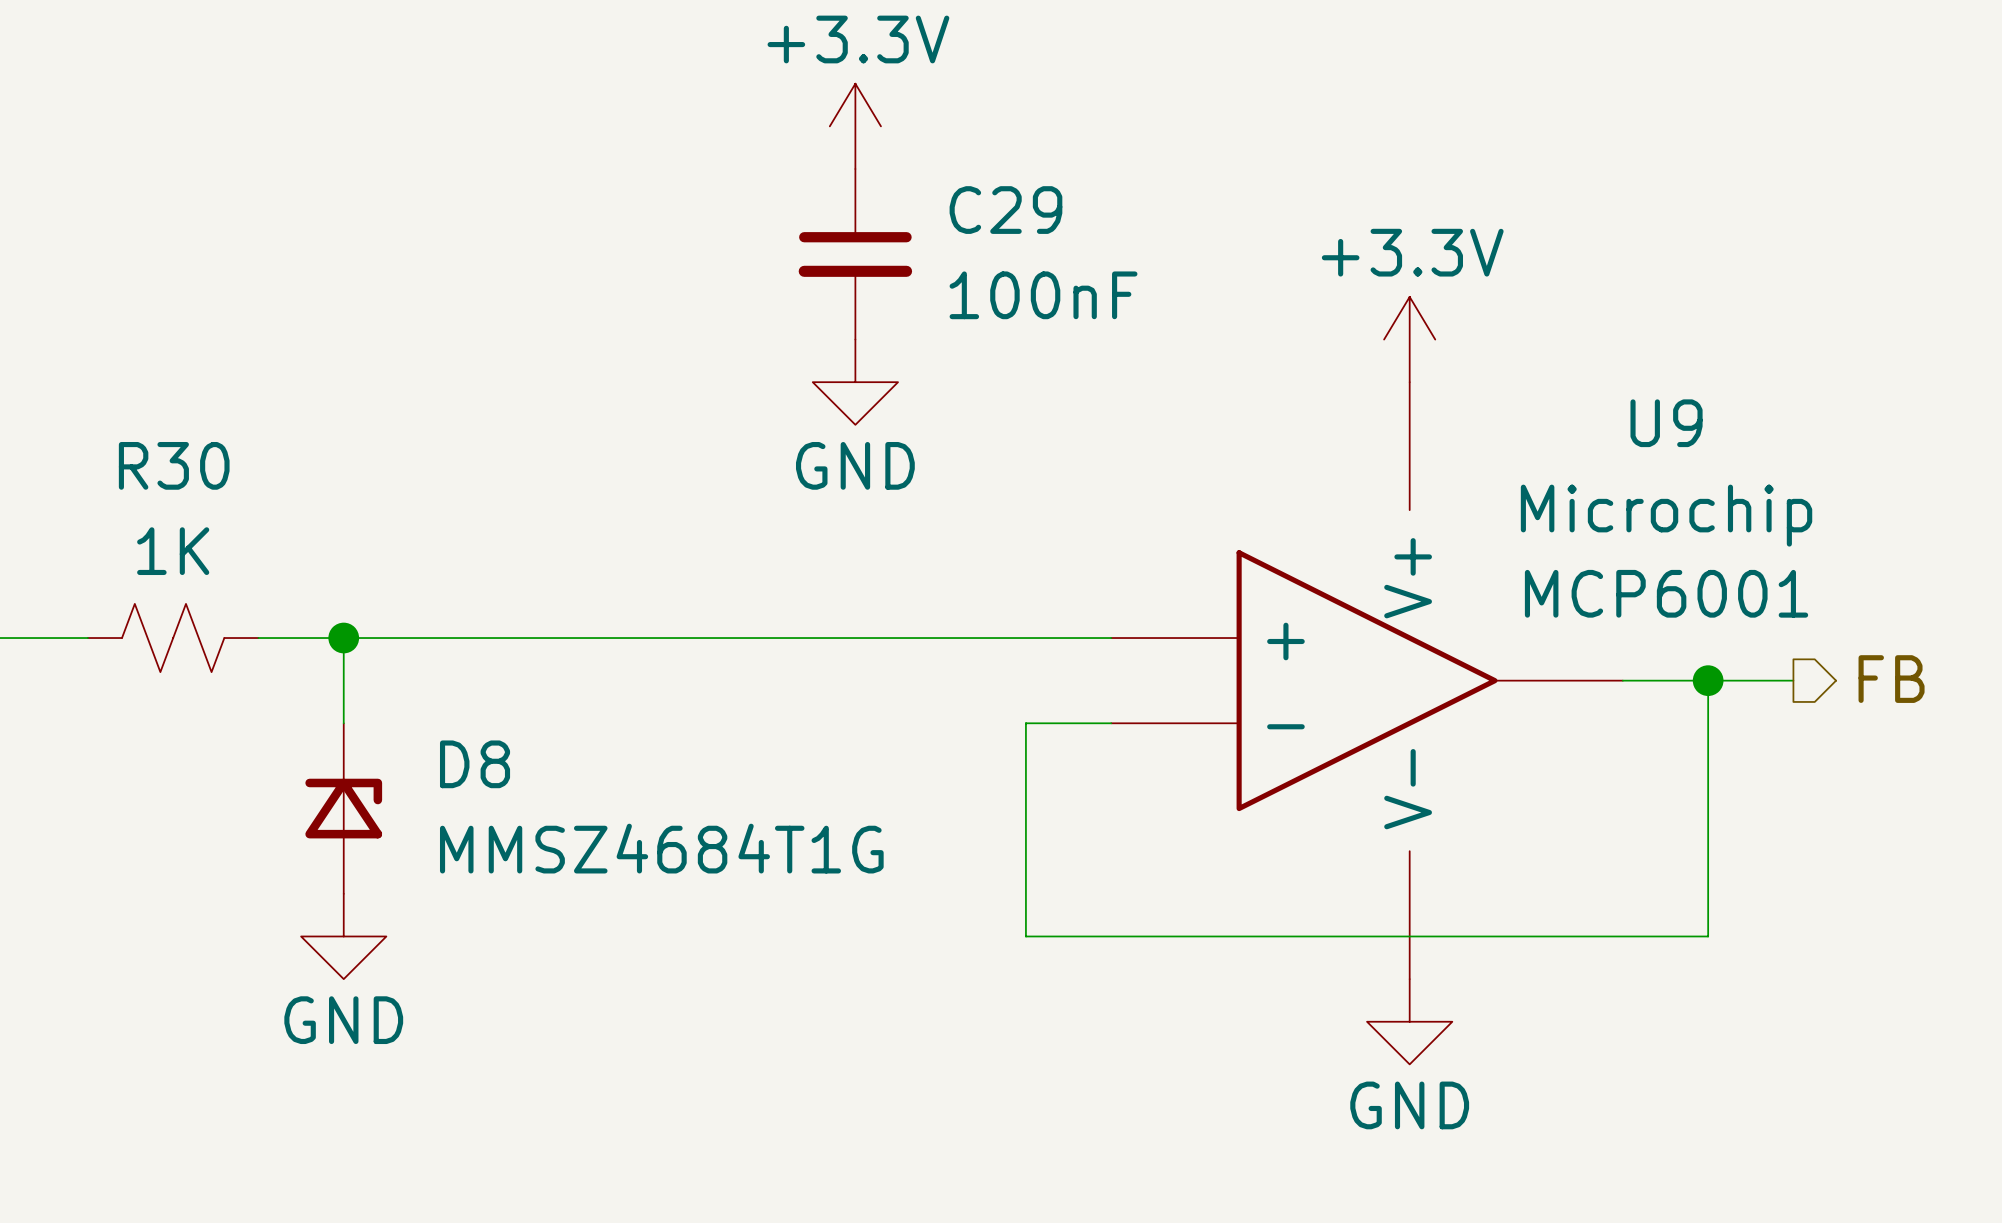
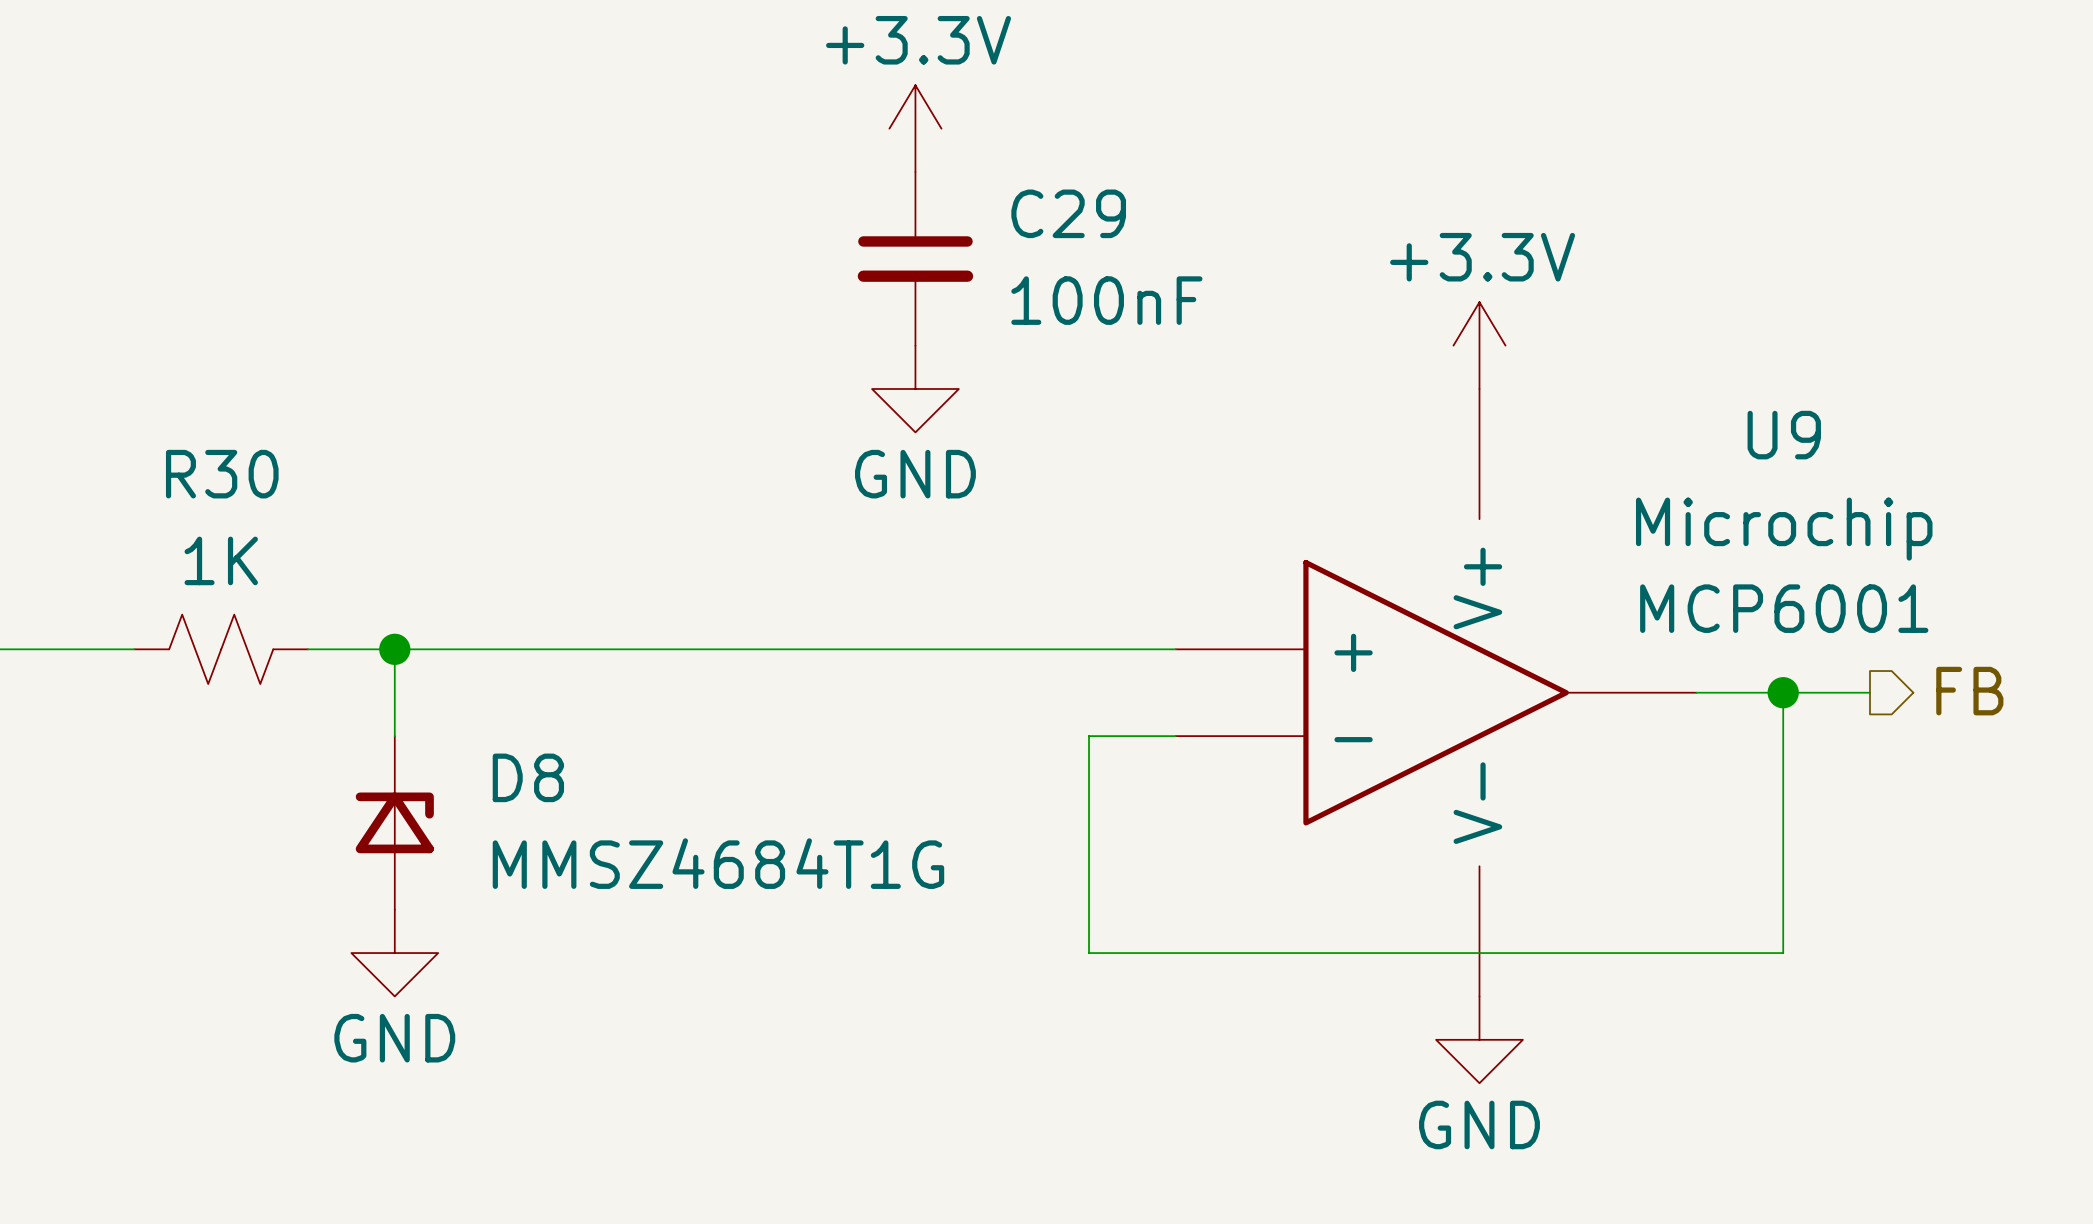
U9 name position: U9 (1666, 423) -> U9 (1784, 435)
U9 text position: Microchip (1666, 515) -> Microchip (1784, 529)
U9 text position: MCP6001 (1666, 593) -> MCP6001 (1784, 608)

